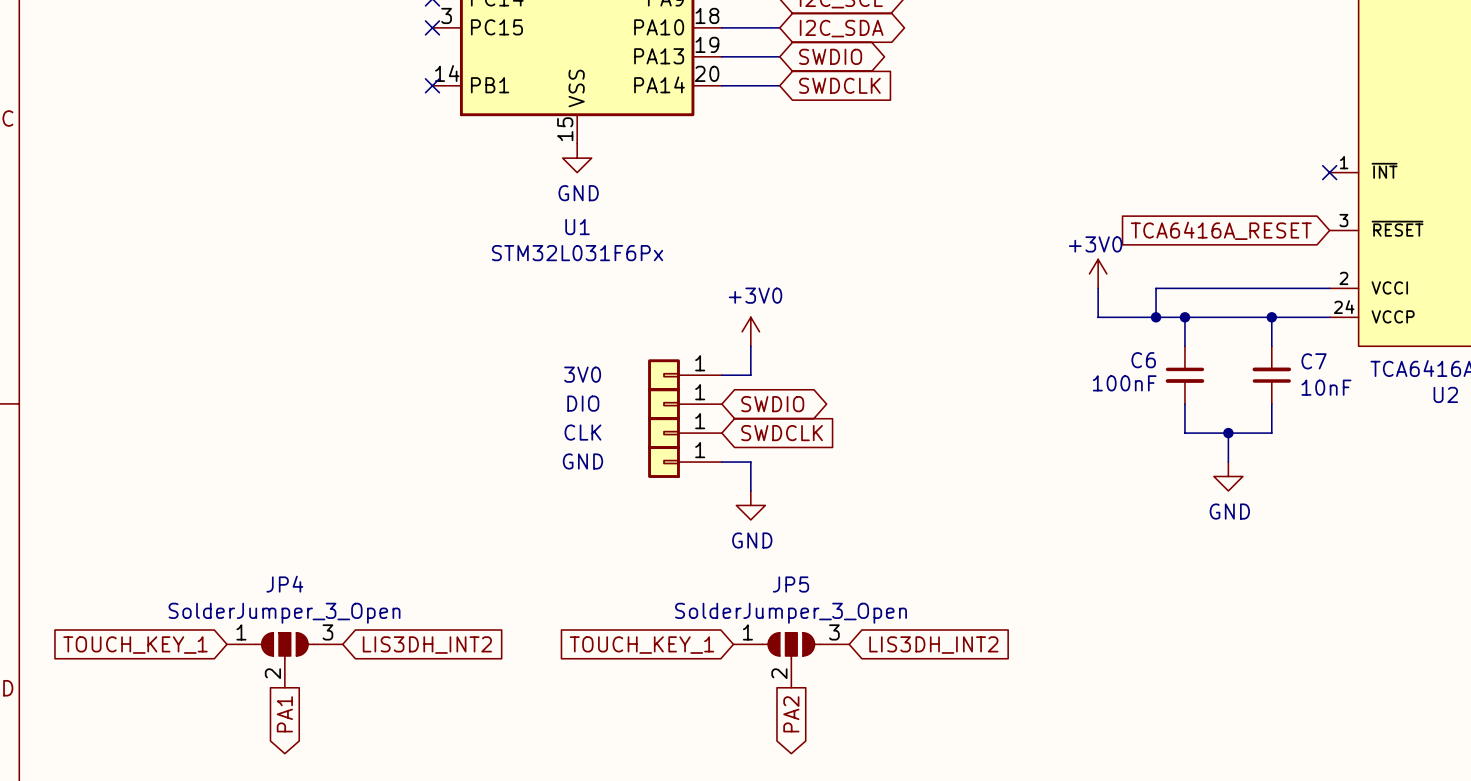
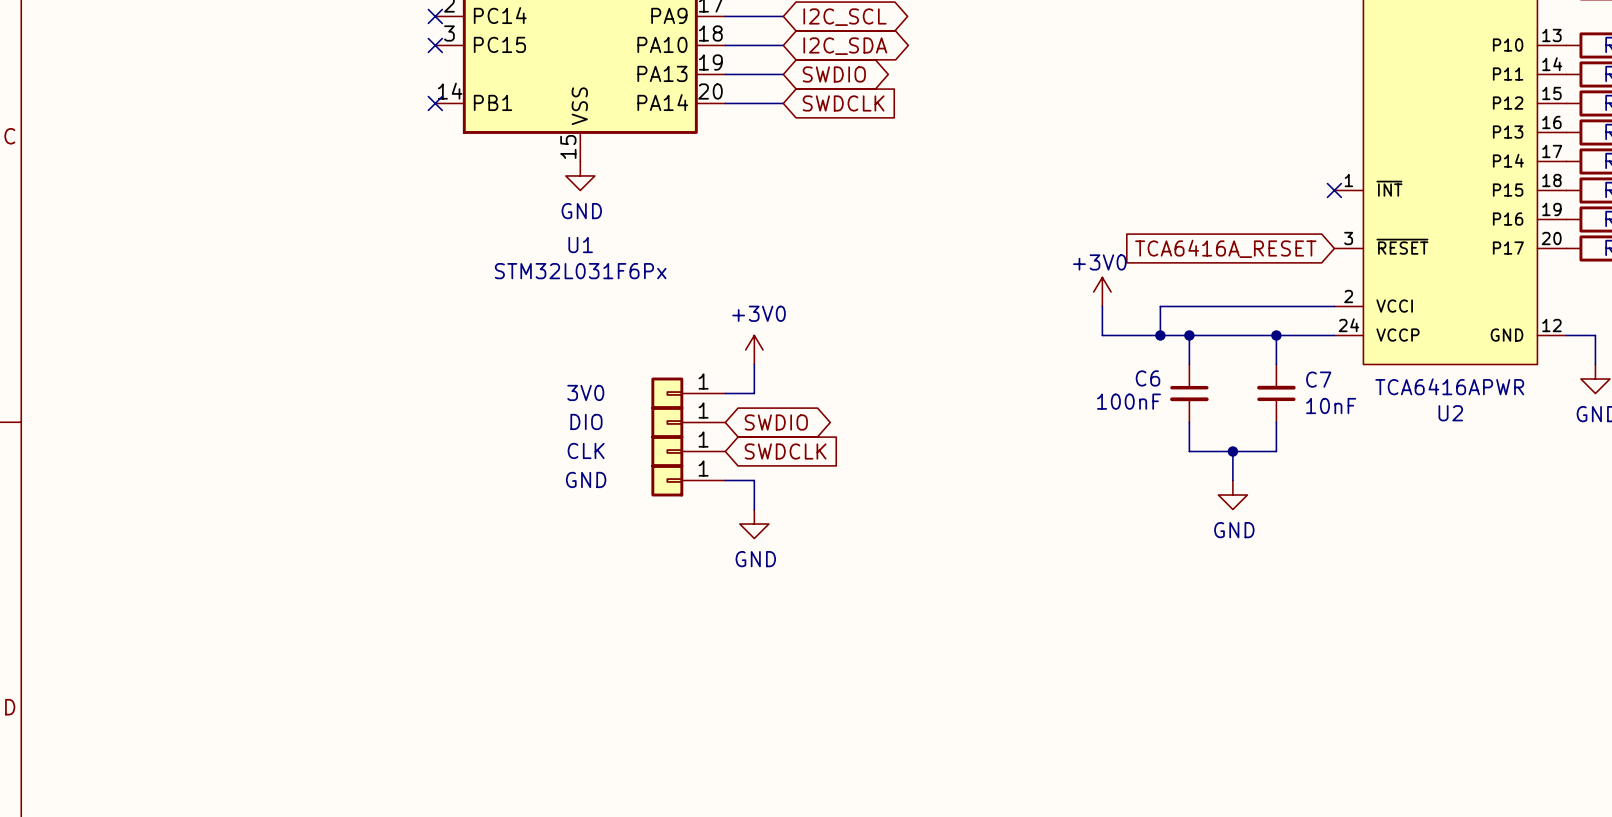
global label: TOUCH_KEY_1 (135, 645) -> none
global label: LIS3DH_INT2 (427, 645) -> none
global label: TOUCH_KEY_1 (641, 645) -> none
global label: LIS3DH_INT2 (933, 645) -> none
JP4: SolderJumper_3_Open (284, 660) -> none
JP5: SolderJumper_3_Open (791, 660) -> none
global label: PA1 (284, 714) -> none
global label: PA2 (791, 714) -> none

